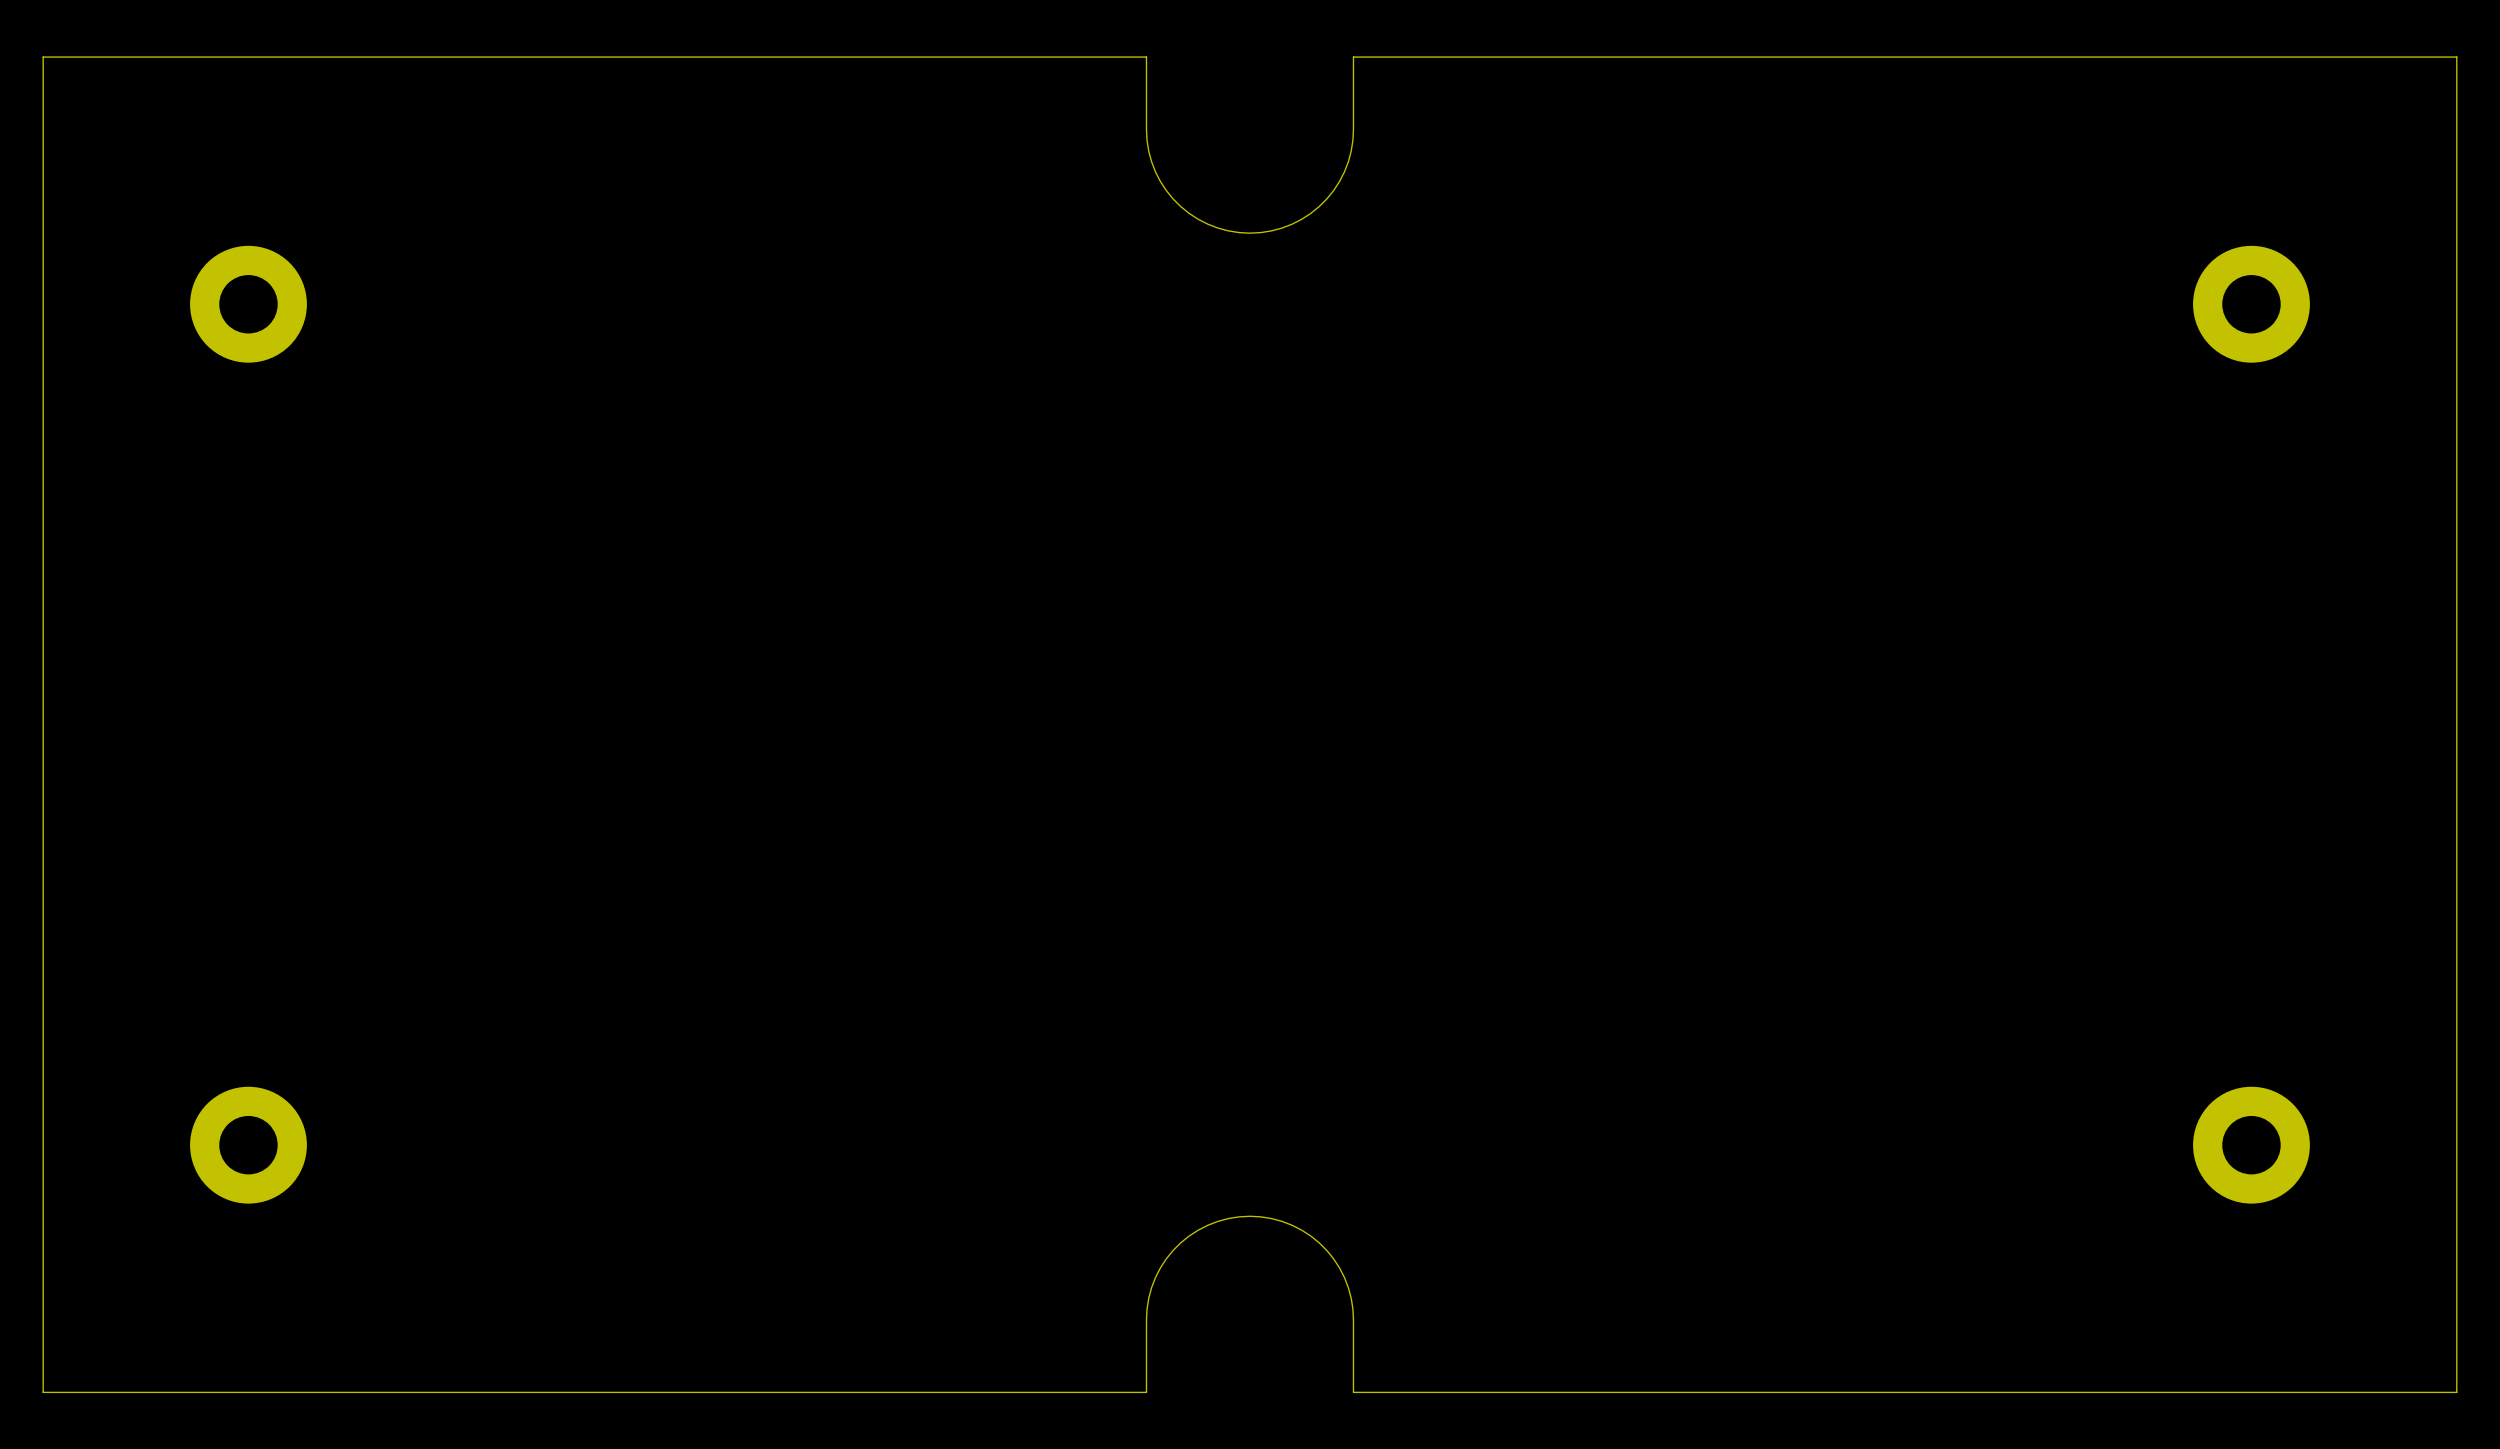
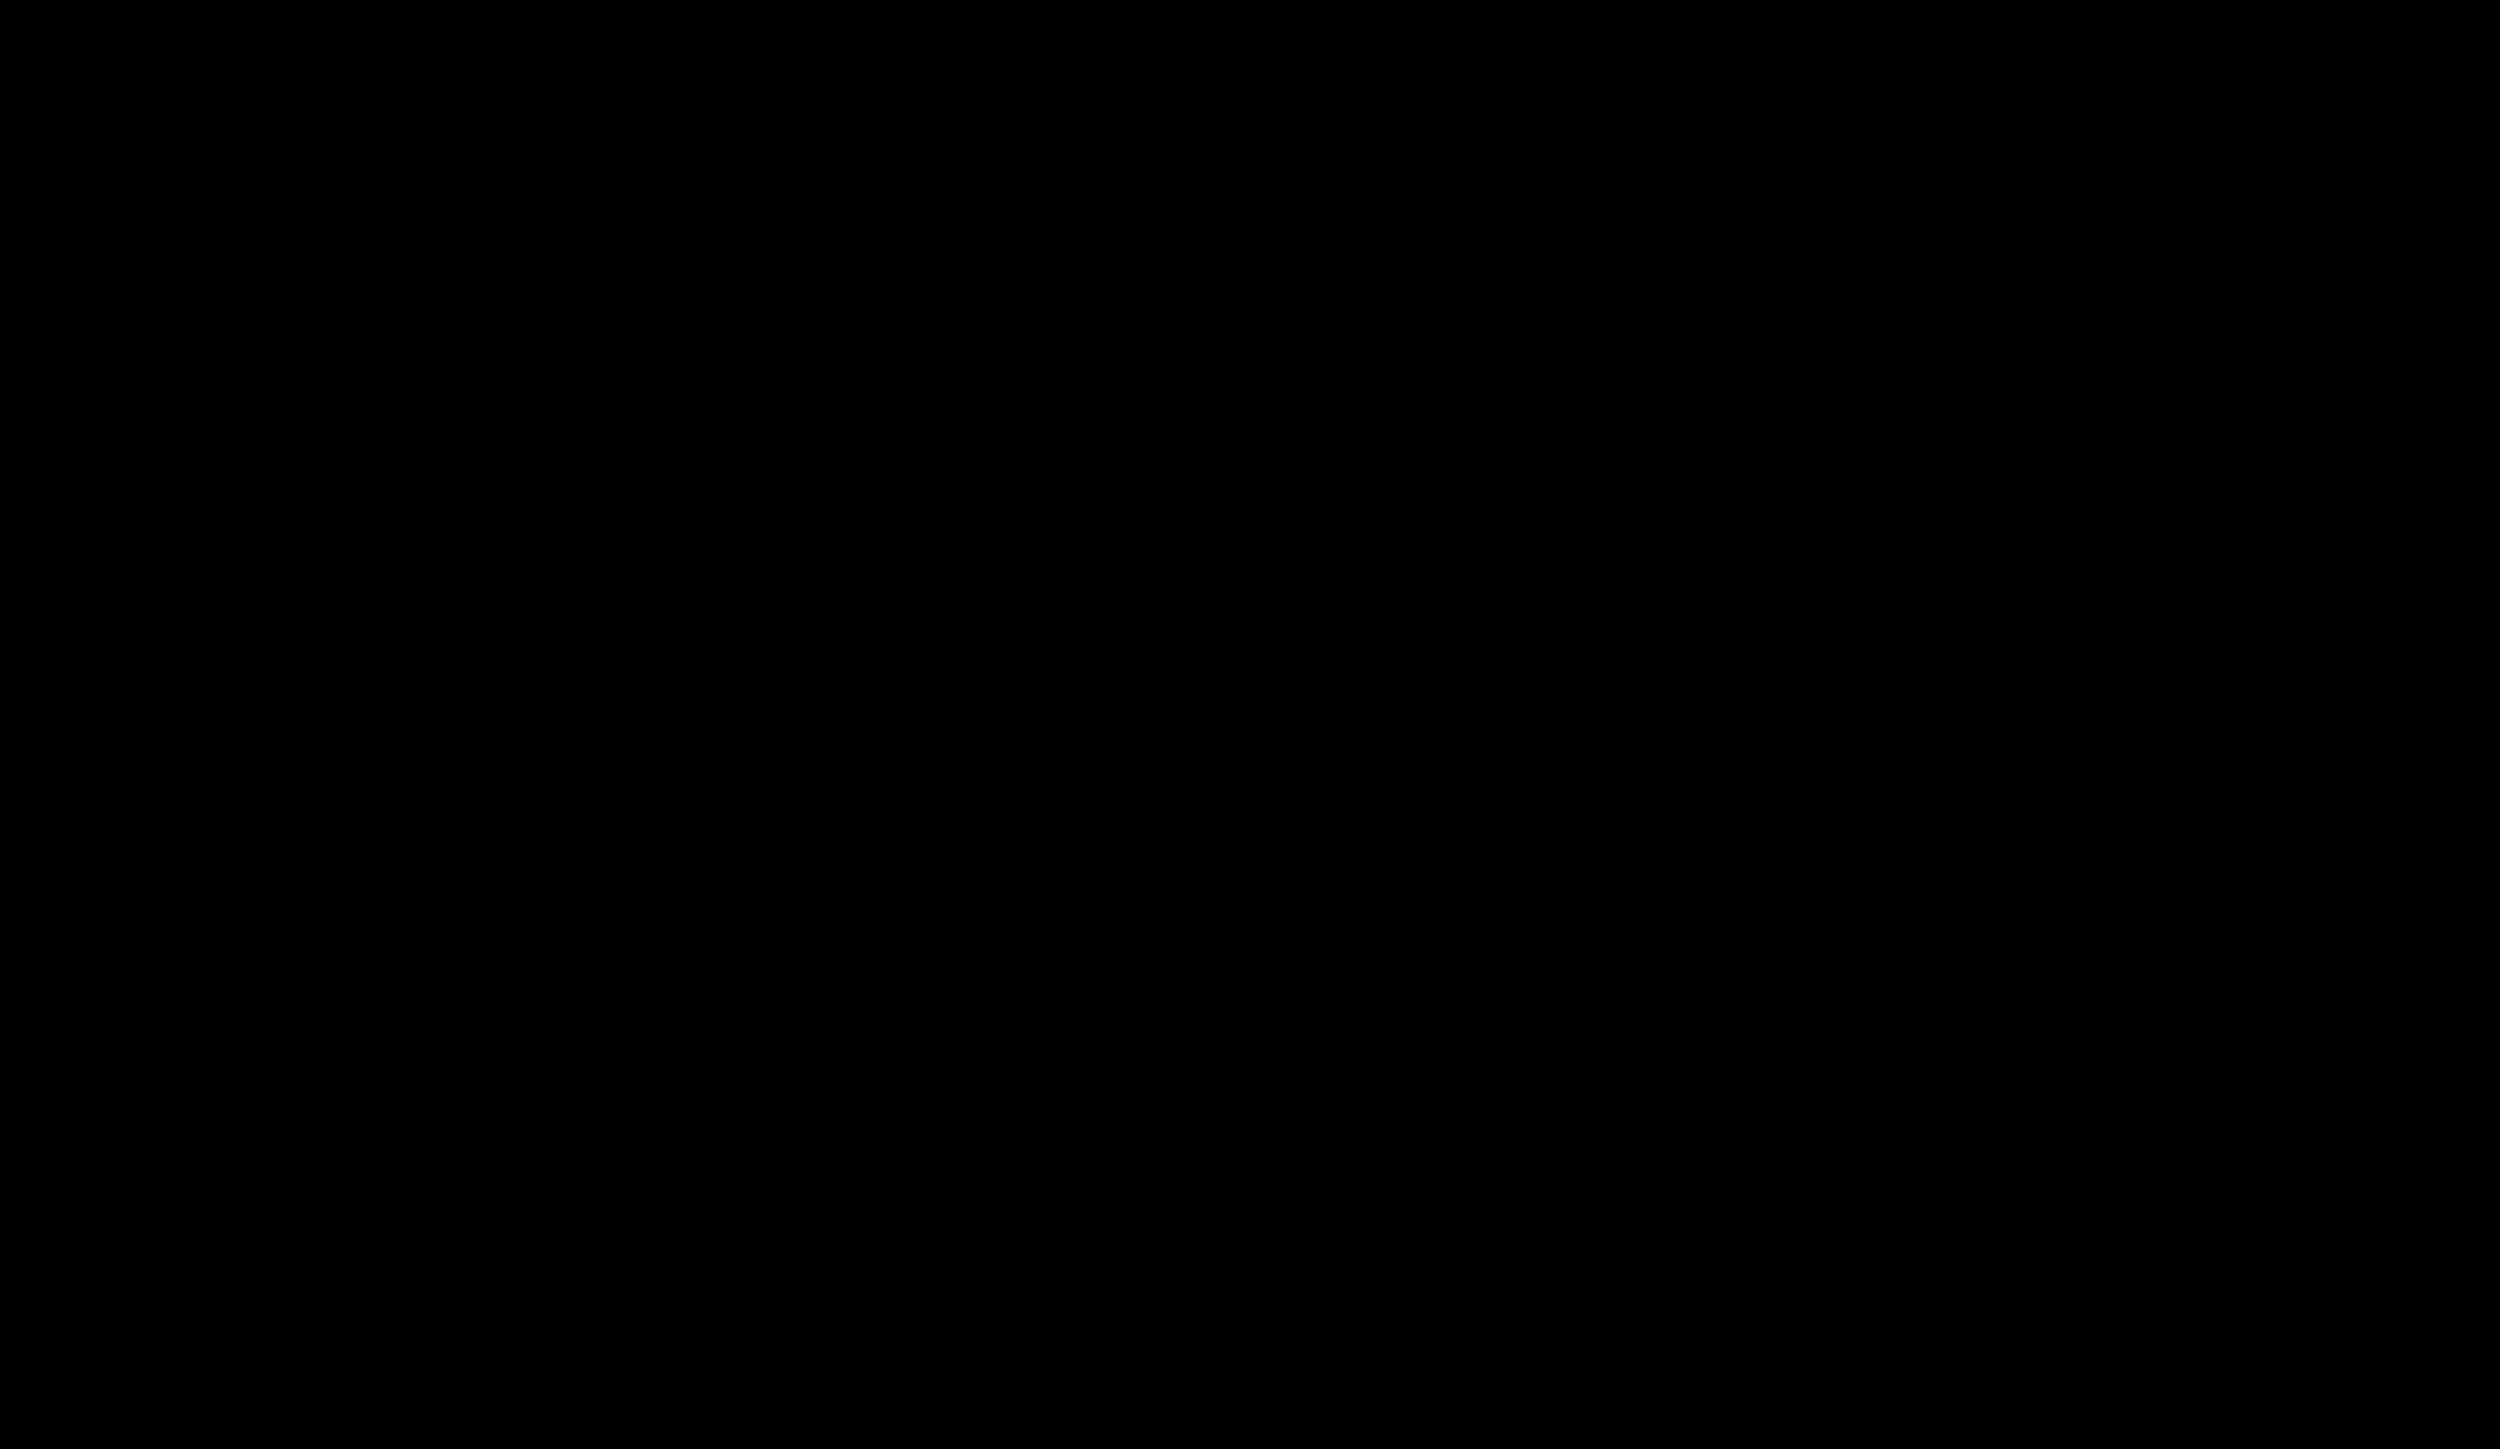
board edge: (2456, 57) (1353, 57) (1352, 140) (1348, 161) (1339, 181) (1319, 206) (1301, 219) (1271, 230) (1249, 233) (1218, 228) (1198, 219) (1180, 206) (1160, 181) (1151, 161) (1147, 140) (1146, 57) (43, 57) (43, 1392) (1146, 1392) (1147, 1308) (1151, 1287) (1160, 1268) (1173, 1250) (1198, 1230) (1228, 1218) (1249, 1216) (1271, 1218) (1301, 1230) (1319, 1242) (1339, 1268) (1348, 1287) (1352, 1308) (1353, 1392) (2456, 1392) (2456, 57) -> none
part: (248, 304) -> none
part: (2251, 304) -> none
part: (248, 1145) -> none
part: (2251, 1145) -> none

